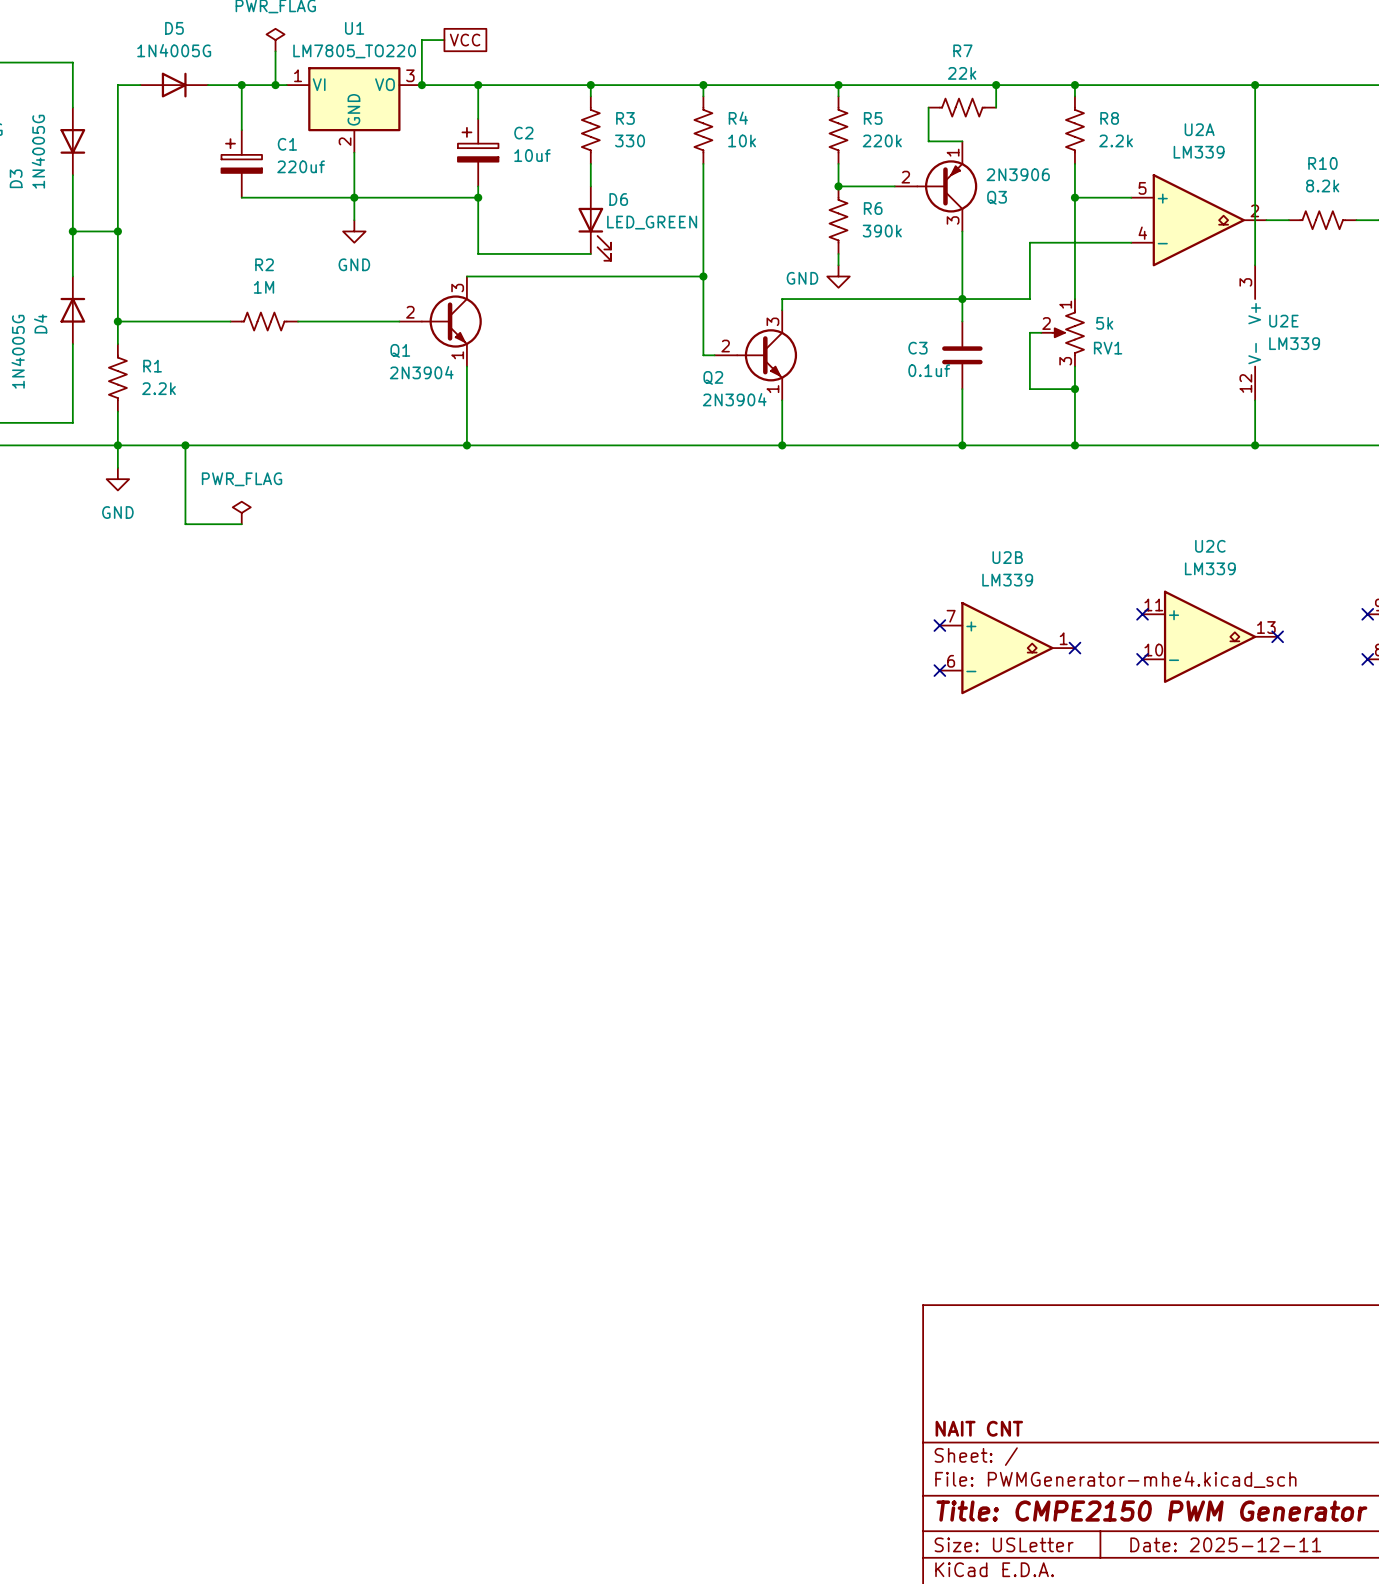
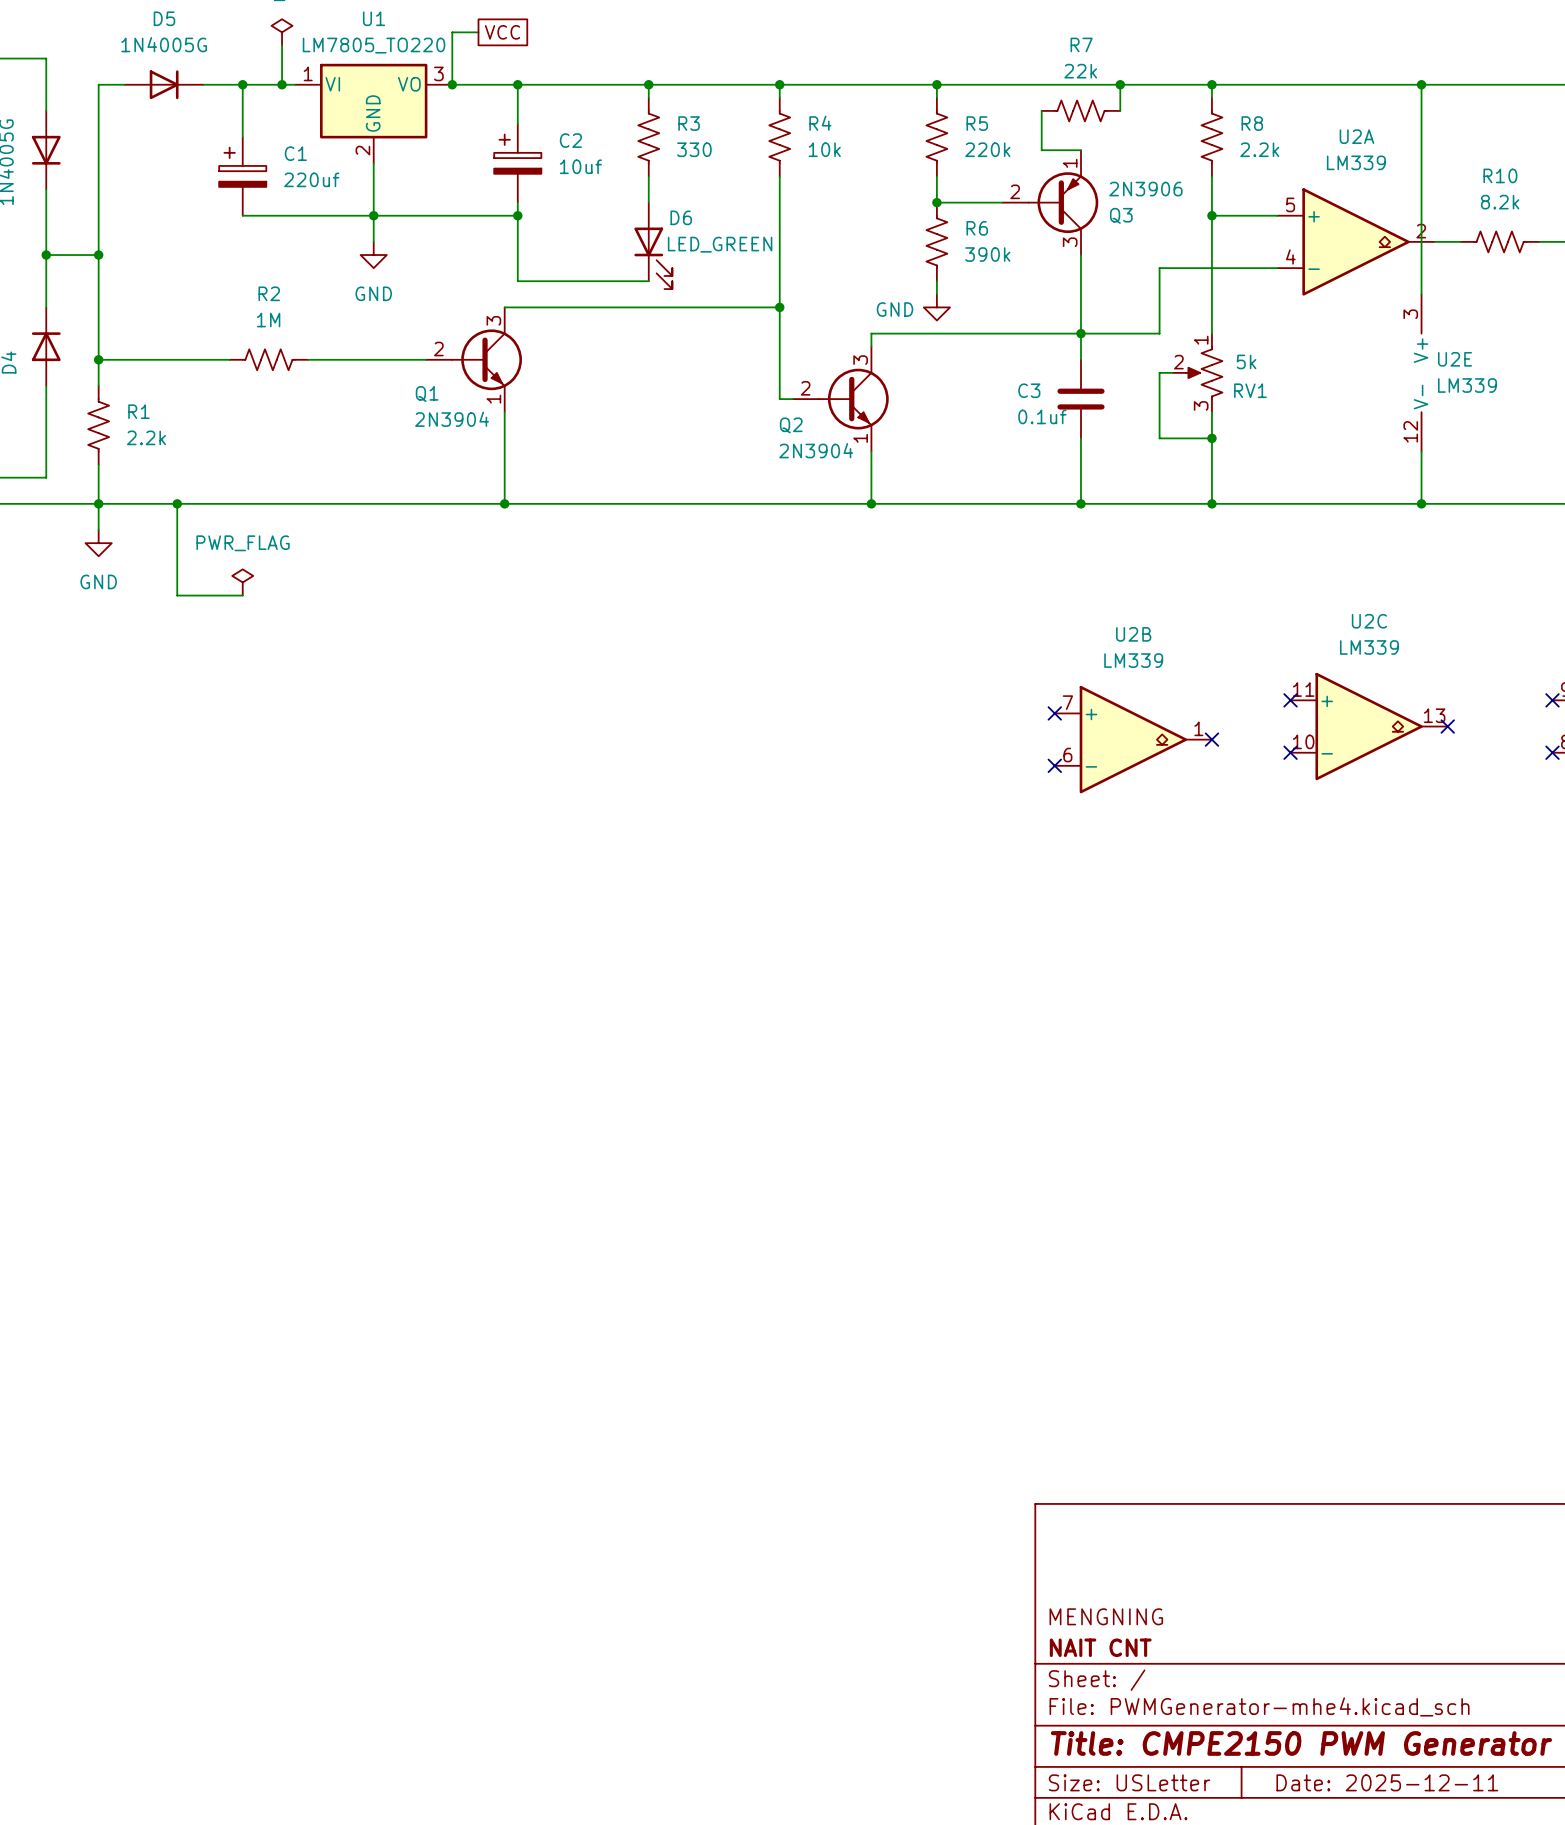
title block: none -> MENGNING (1106, 1616)

